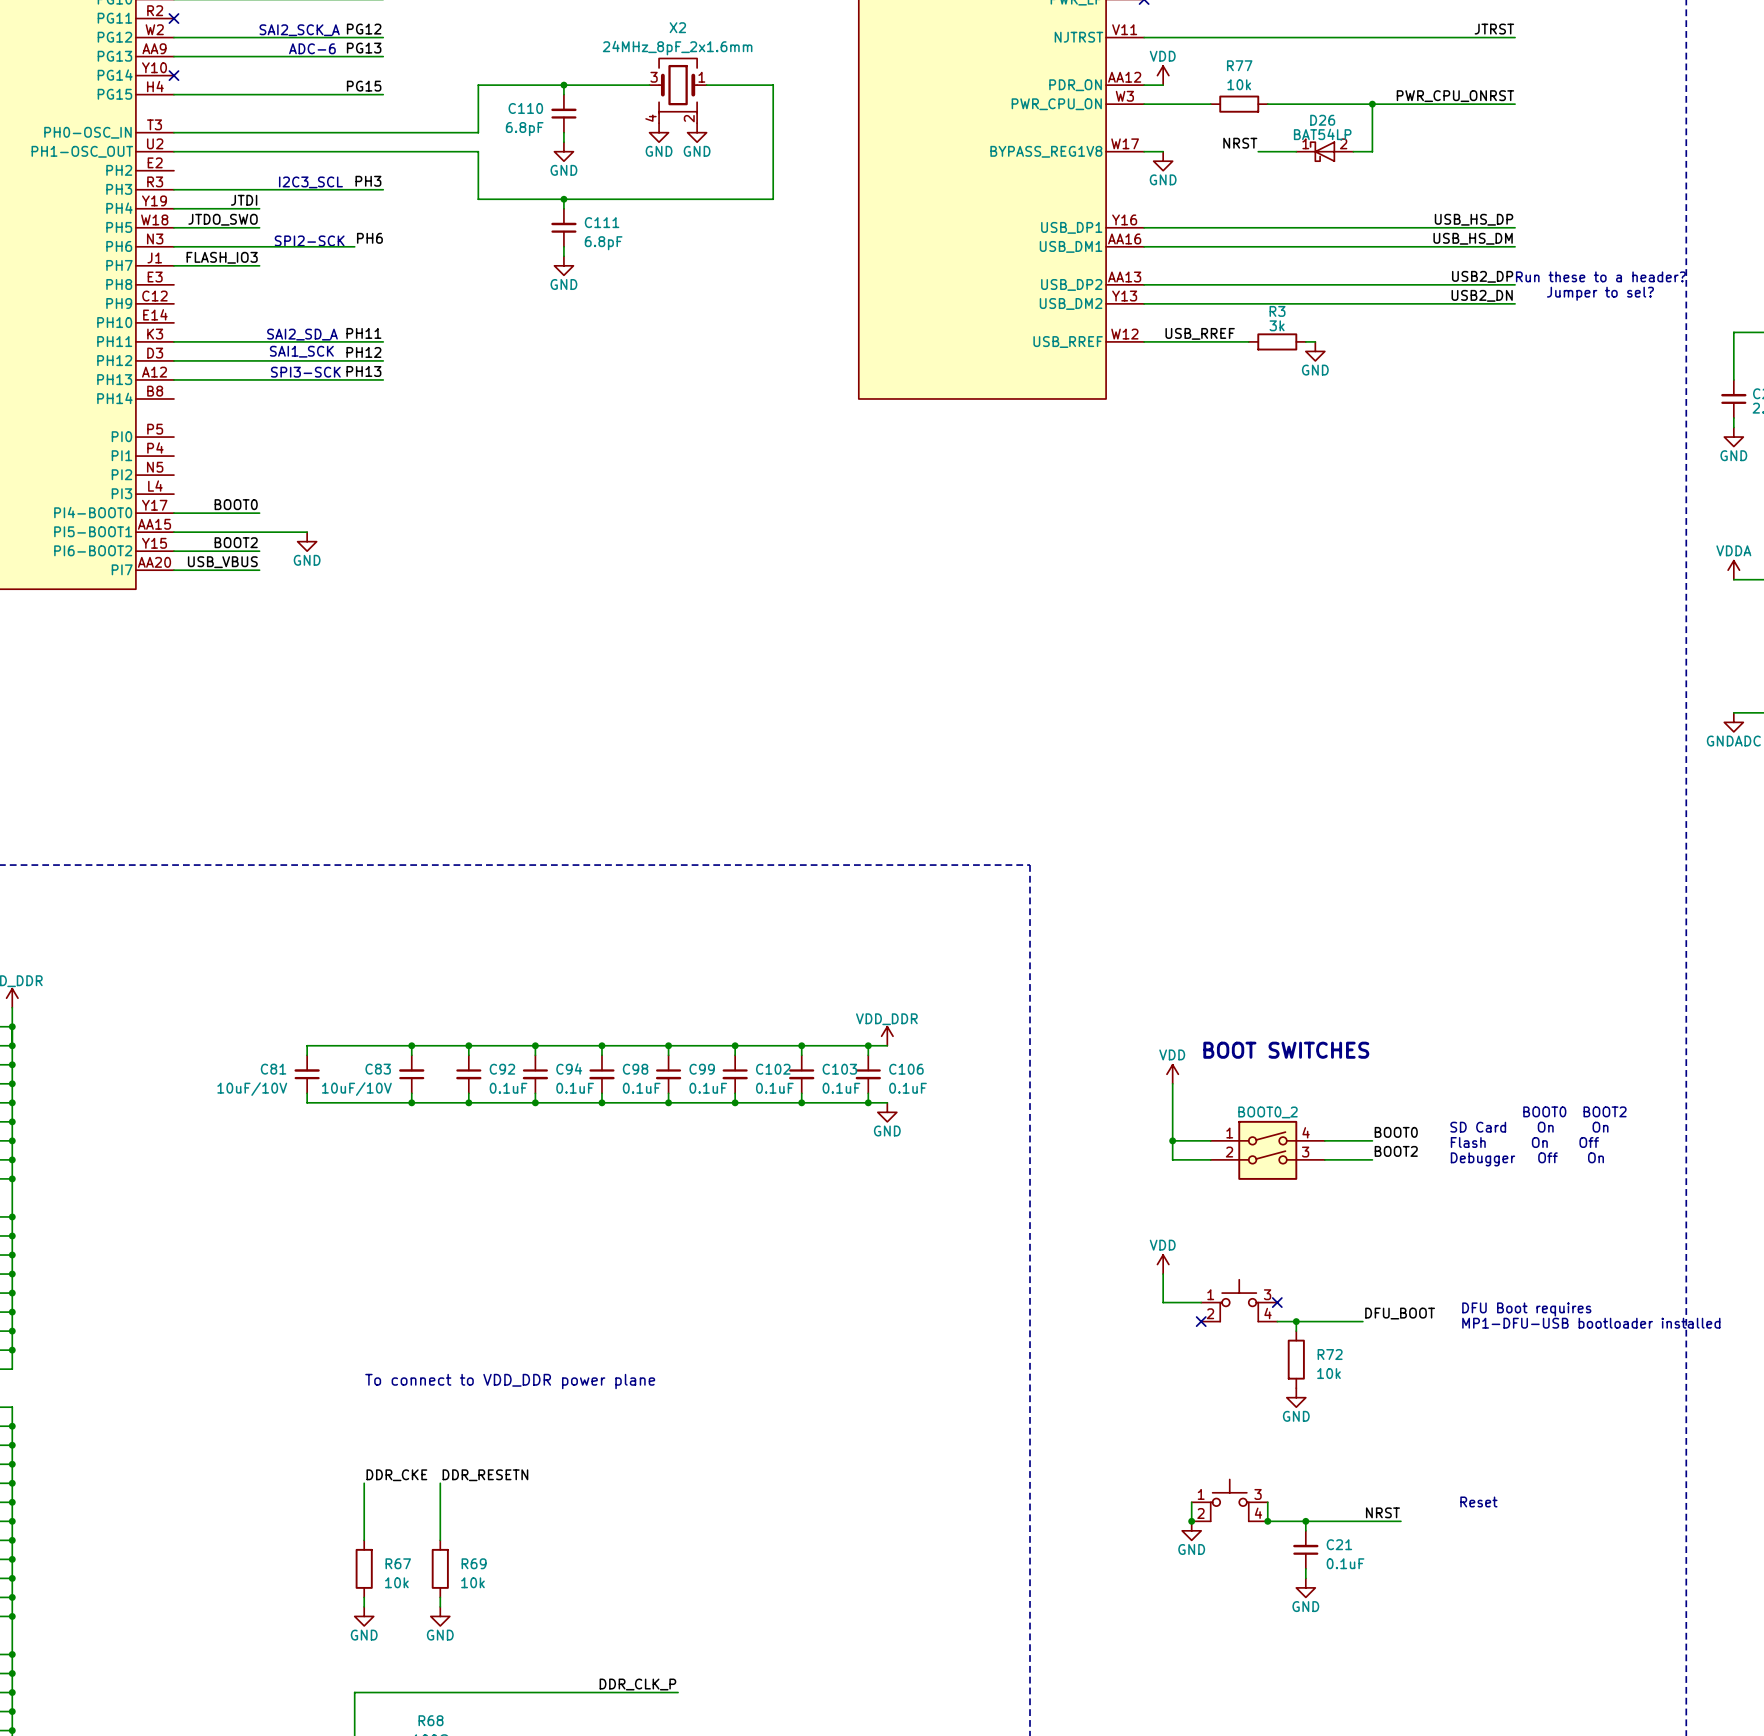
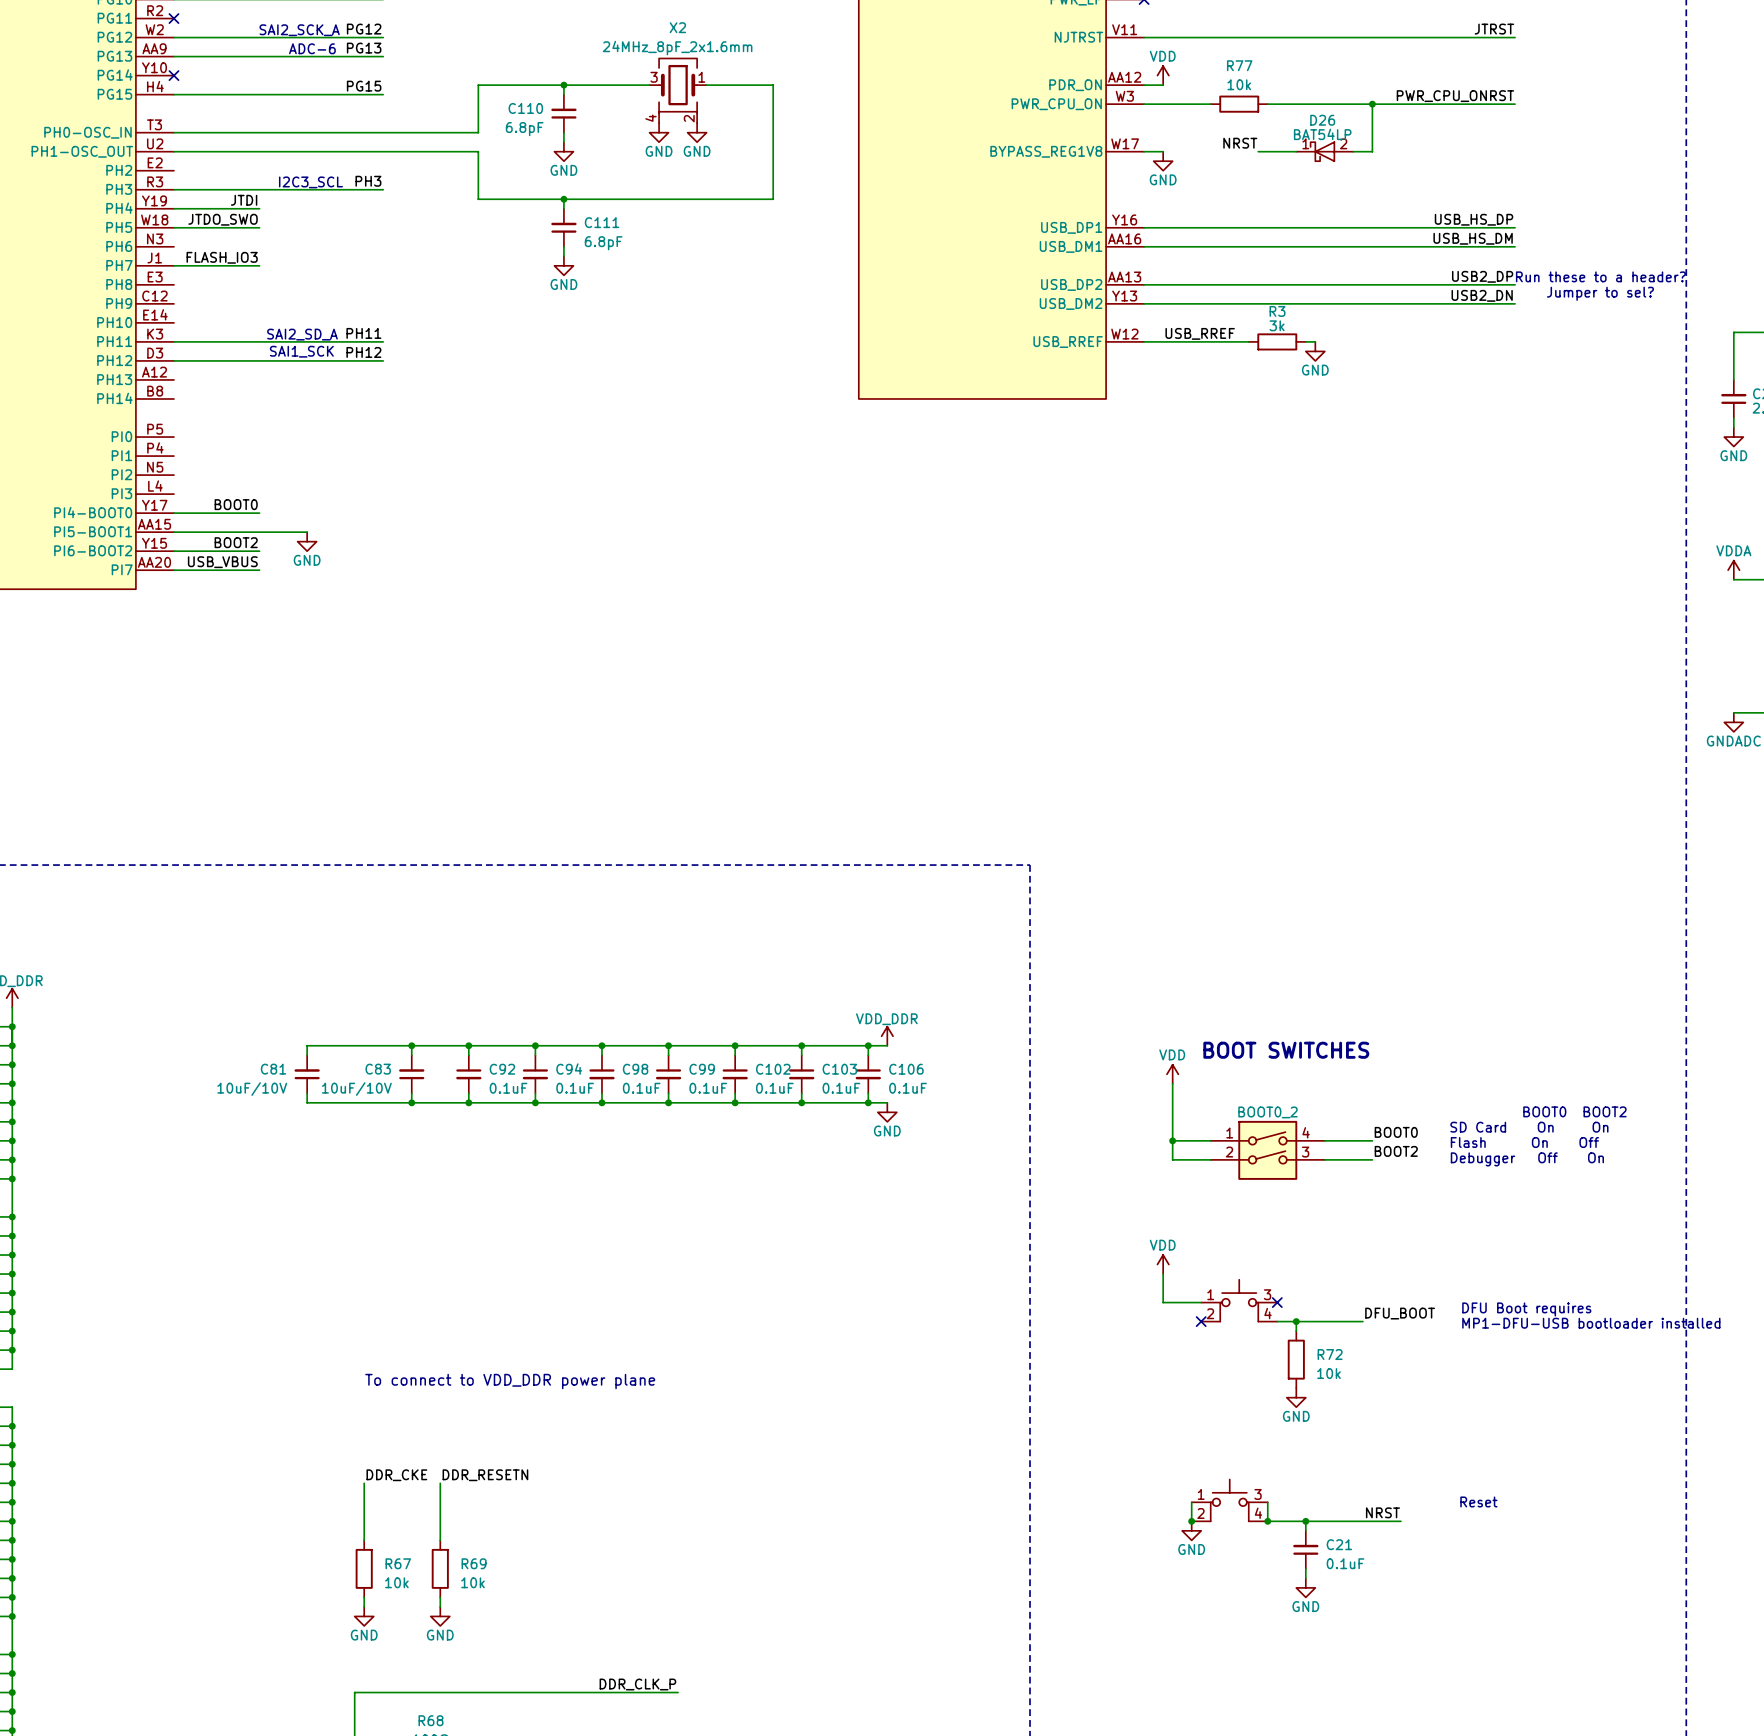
label: PH6 (369, 238) -> none
text: SPI2-SCK (309, 240) -> none
wire: (173, 246) (354, 246) -> none
label: PH13 (363, 371) -> none
text: SPI3-SCK (305, 372) -> none
wire: (173, 379) (383, 379) -> none

